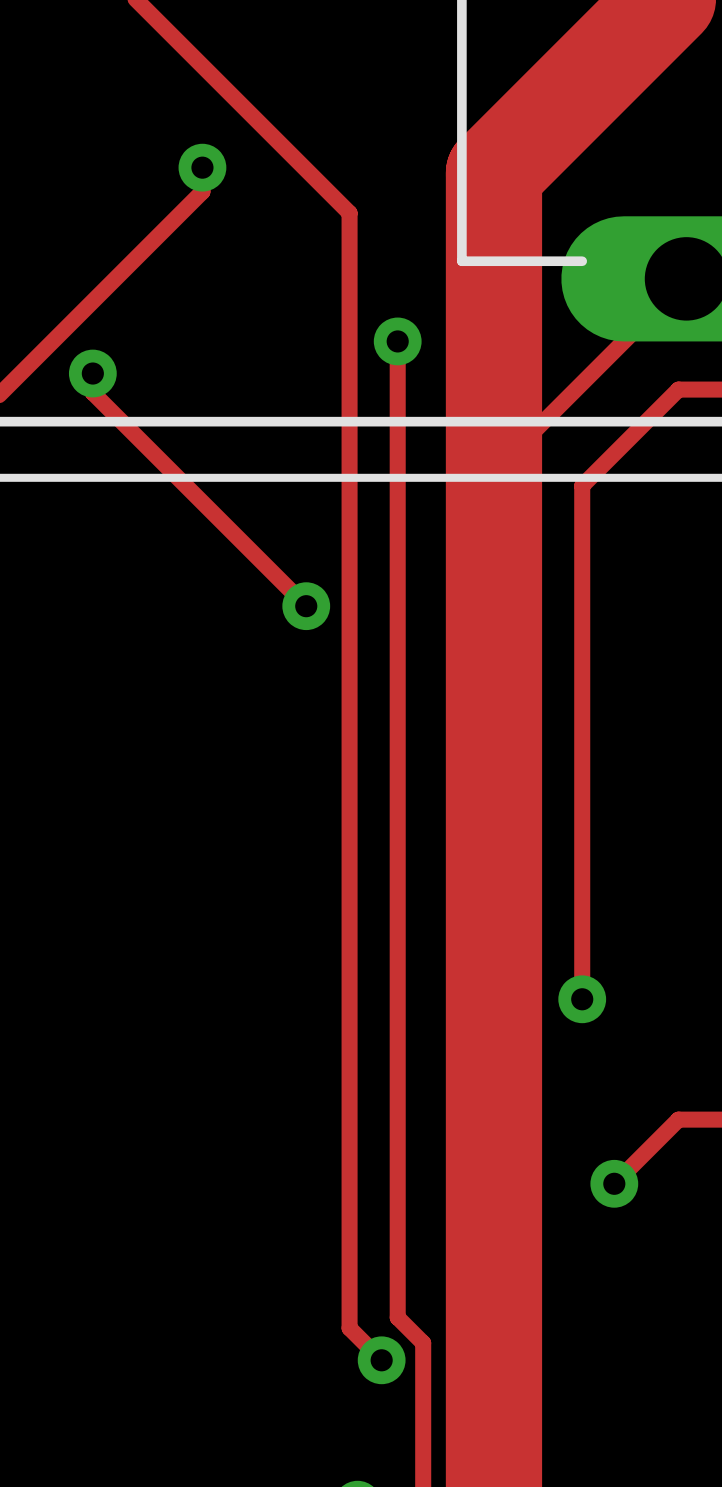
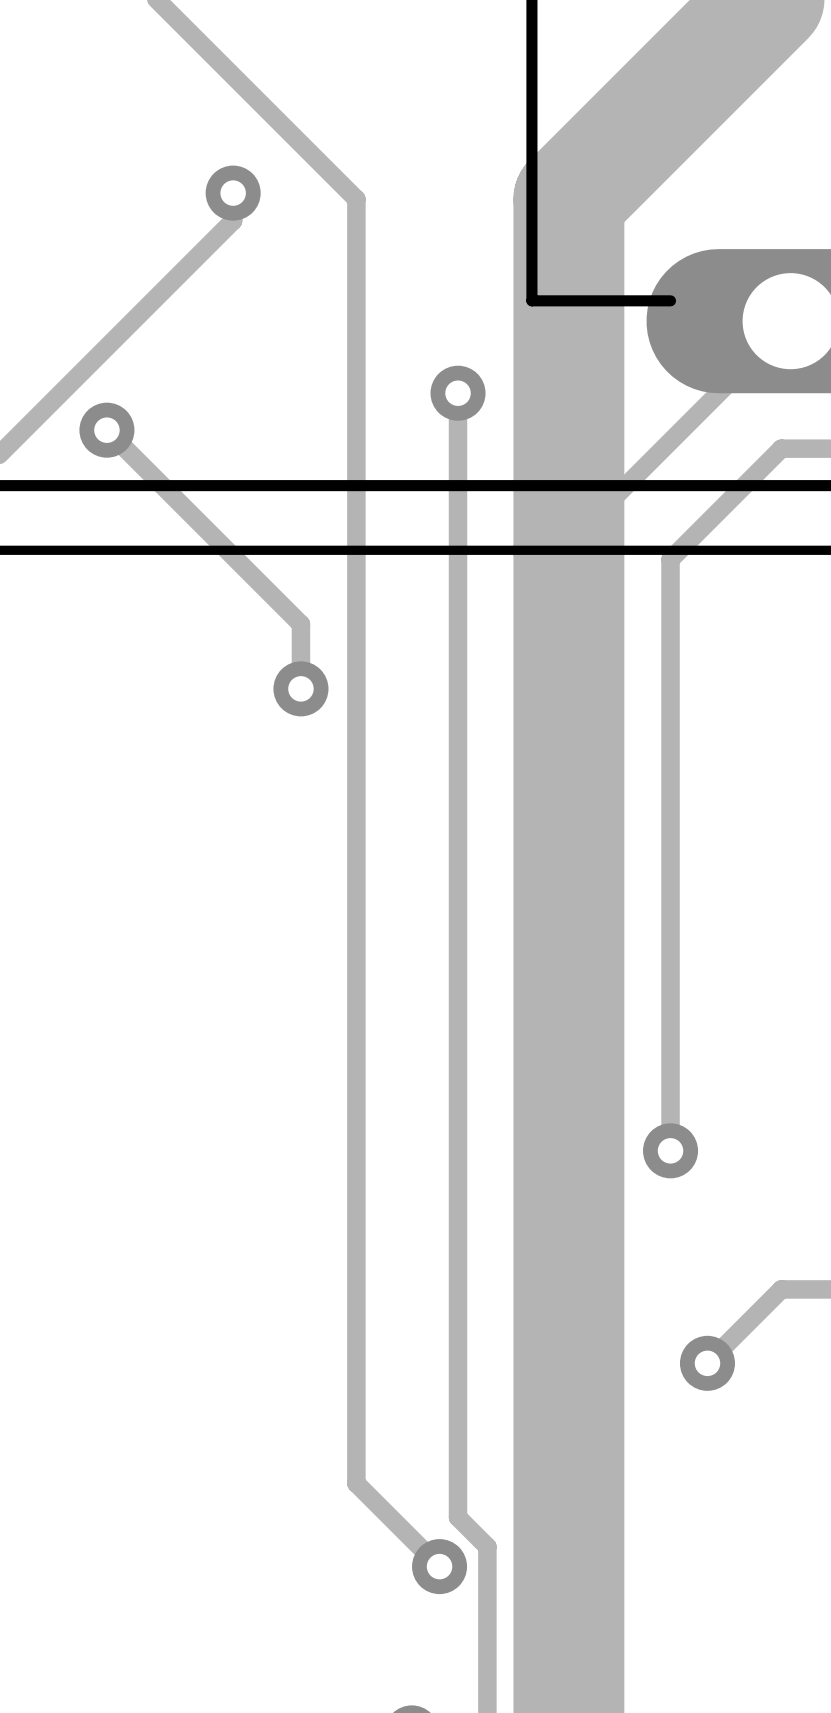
track: (309, 172) (349, 213) (349, 1328) -> (356, 199) (356, 1483) (402, 1529)
track: (92, 373) (92, 392) (306, 606) -> (106, 430) (300, 624) (300, 688)
via position: (306, 606) -> (300, 688)

